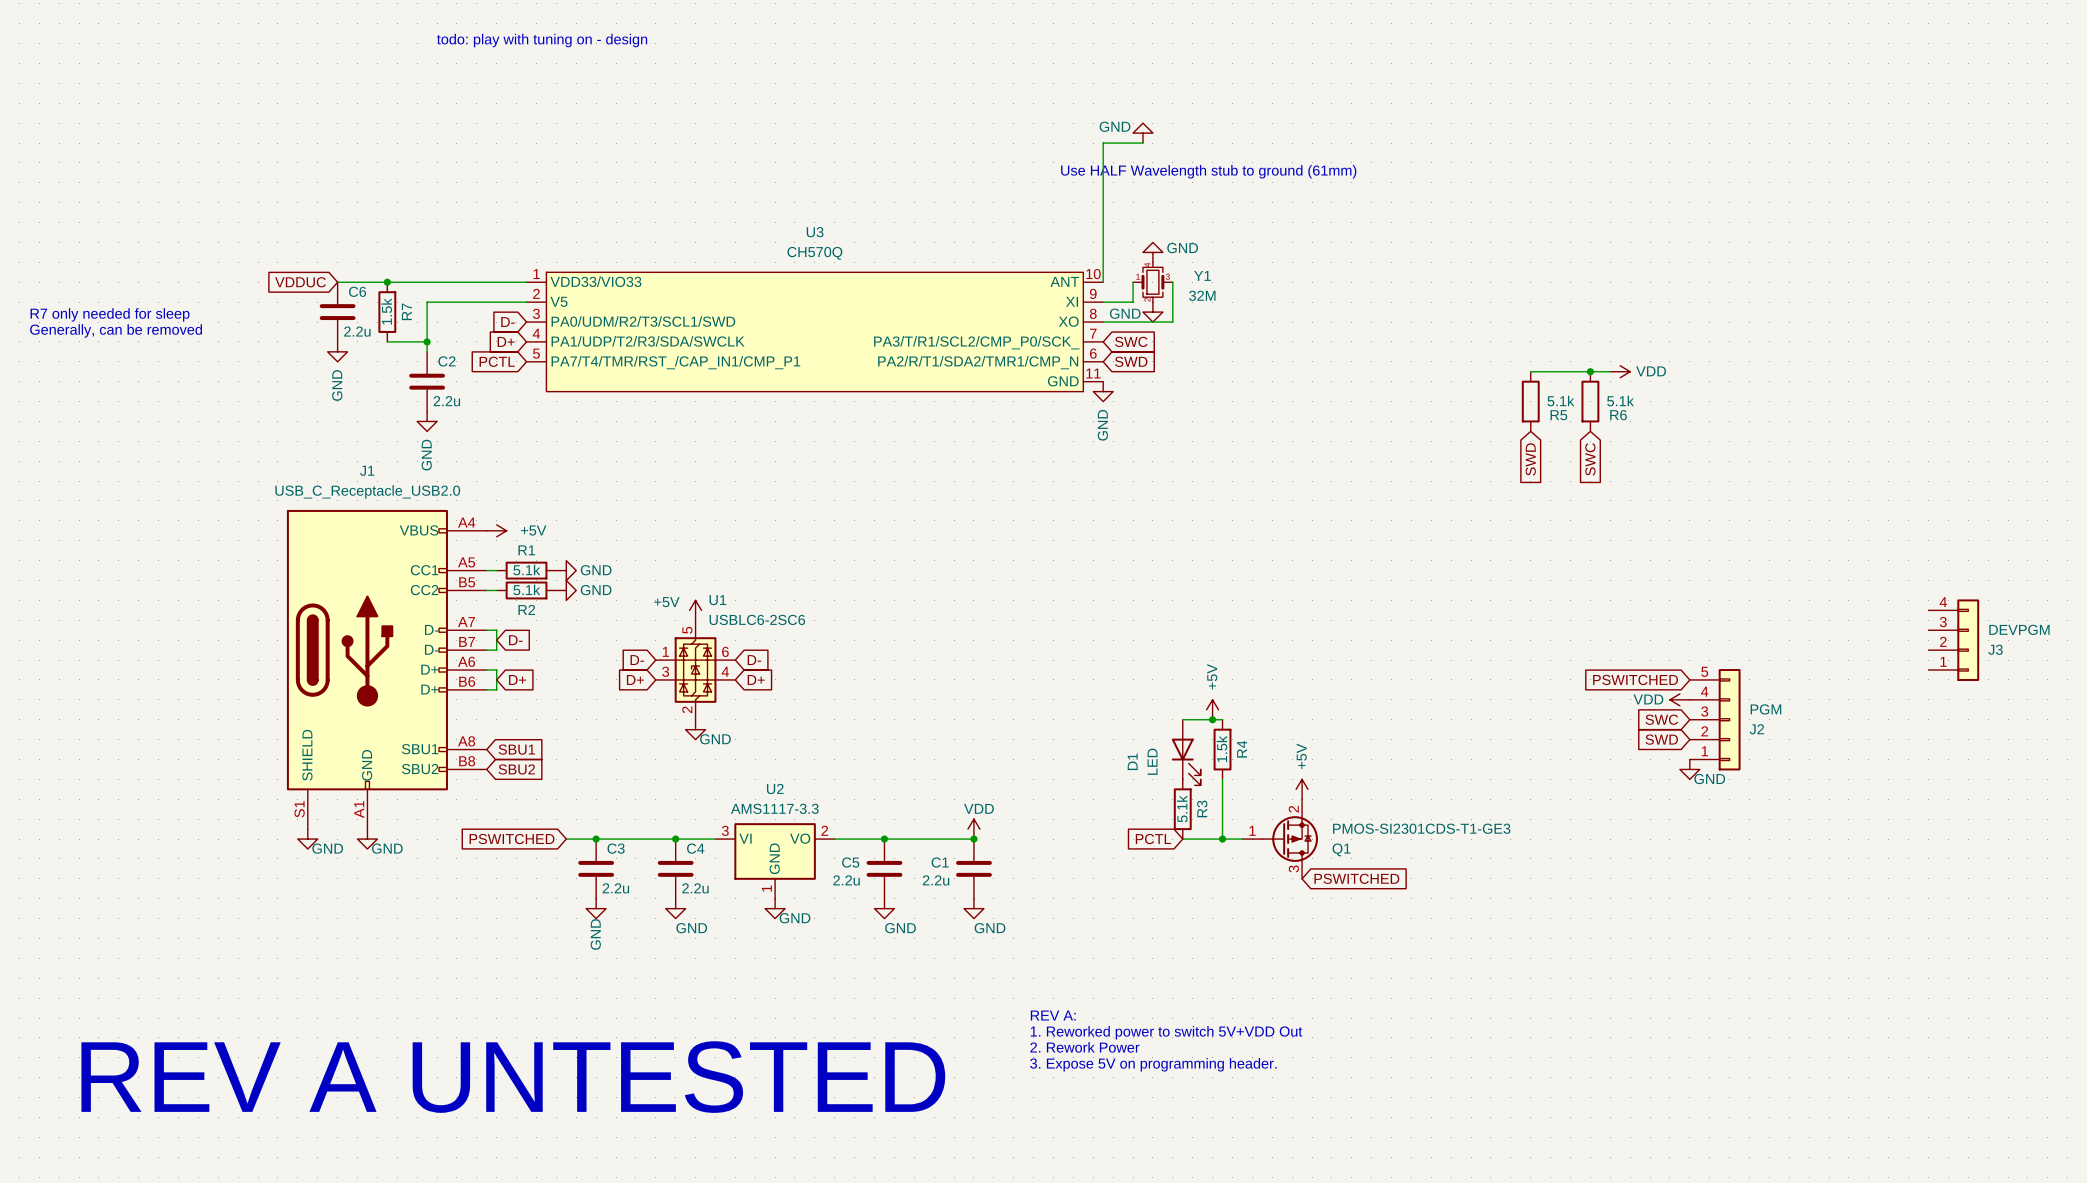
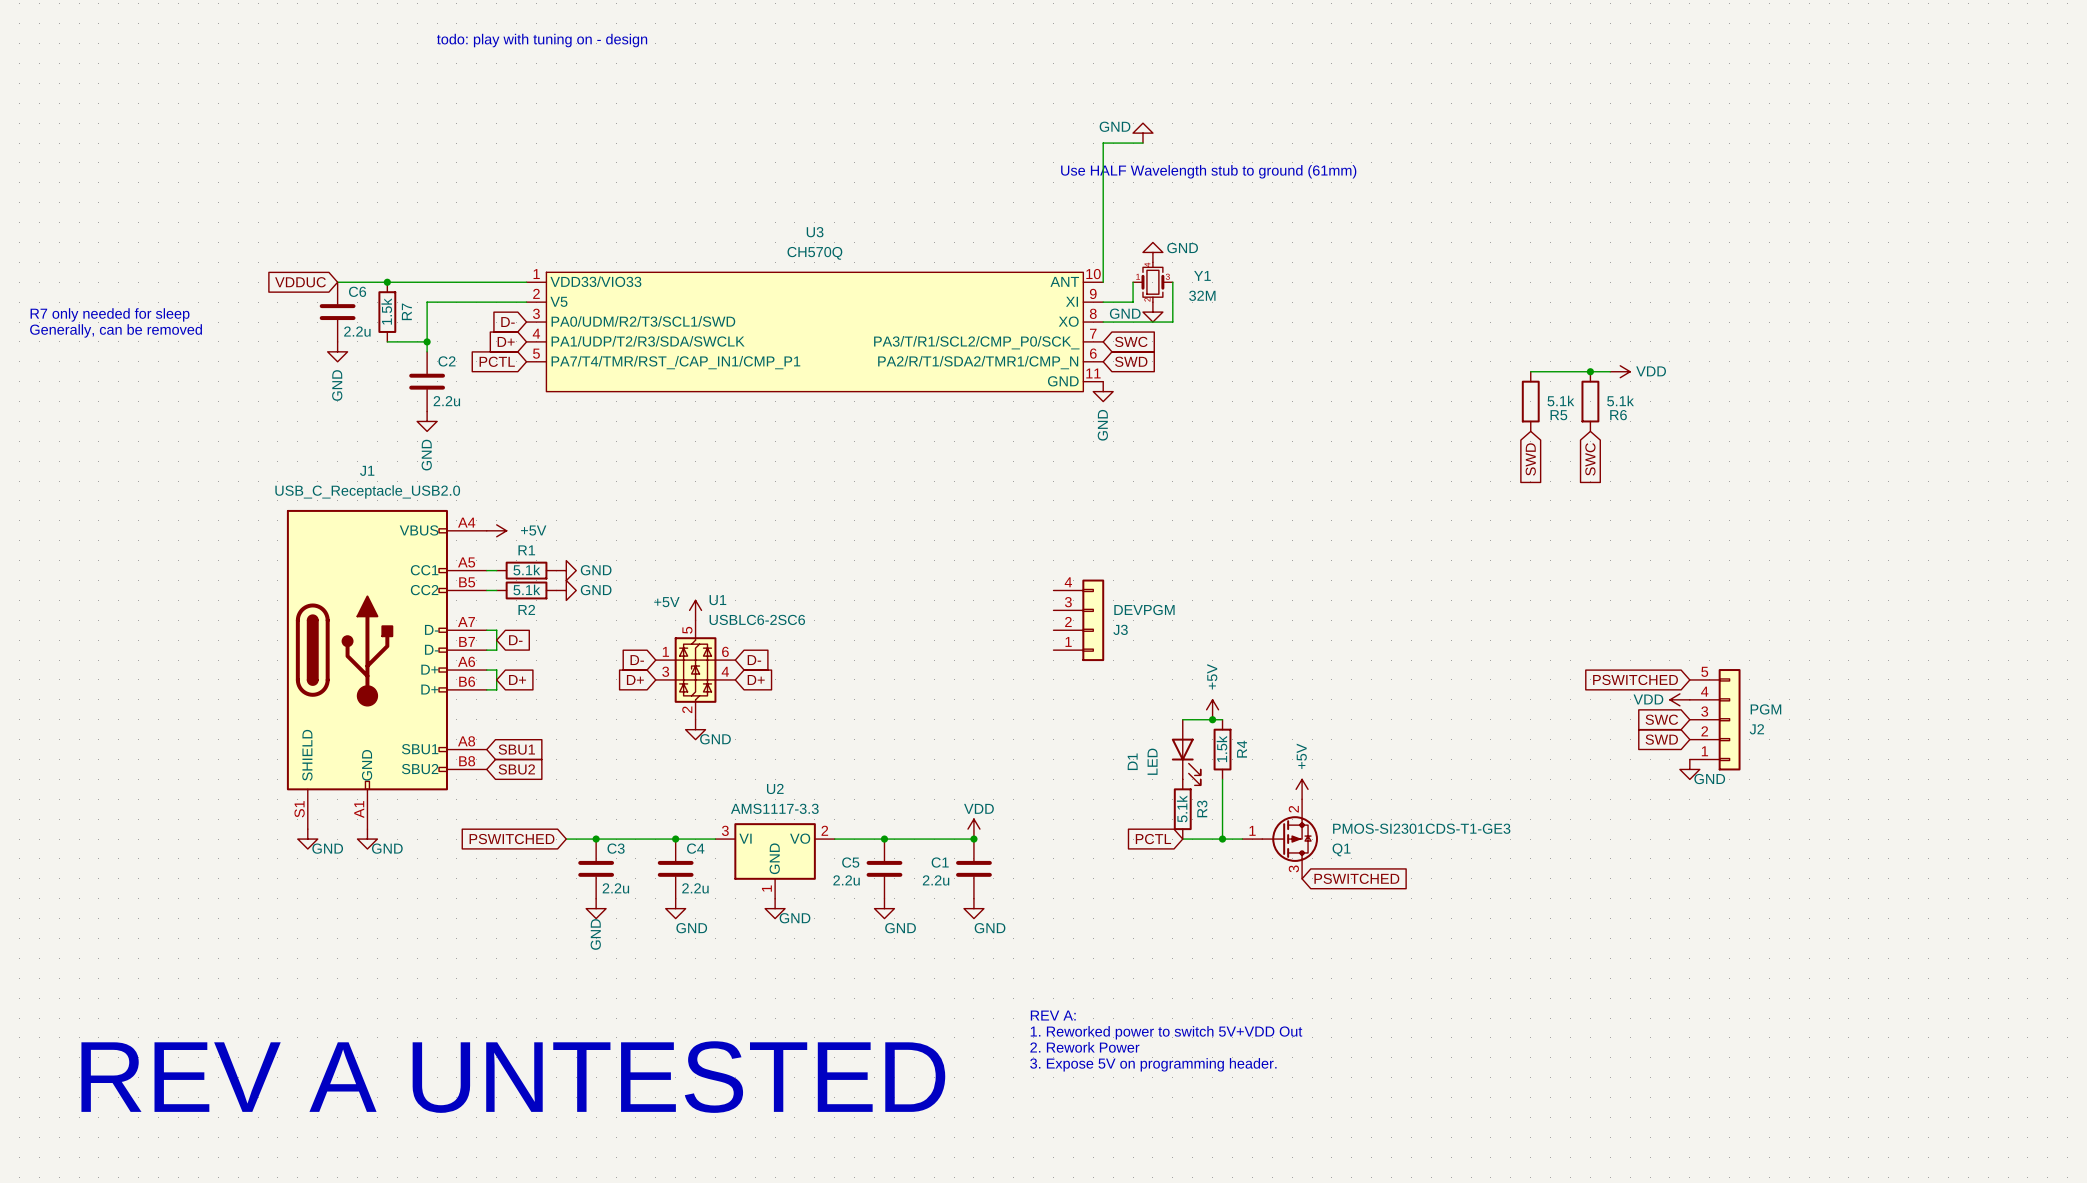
J3 position: (1953, 640) -> (1078, 620)

